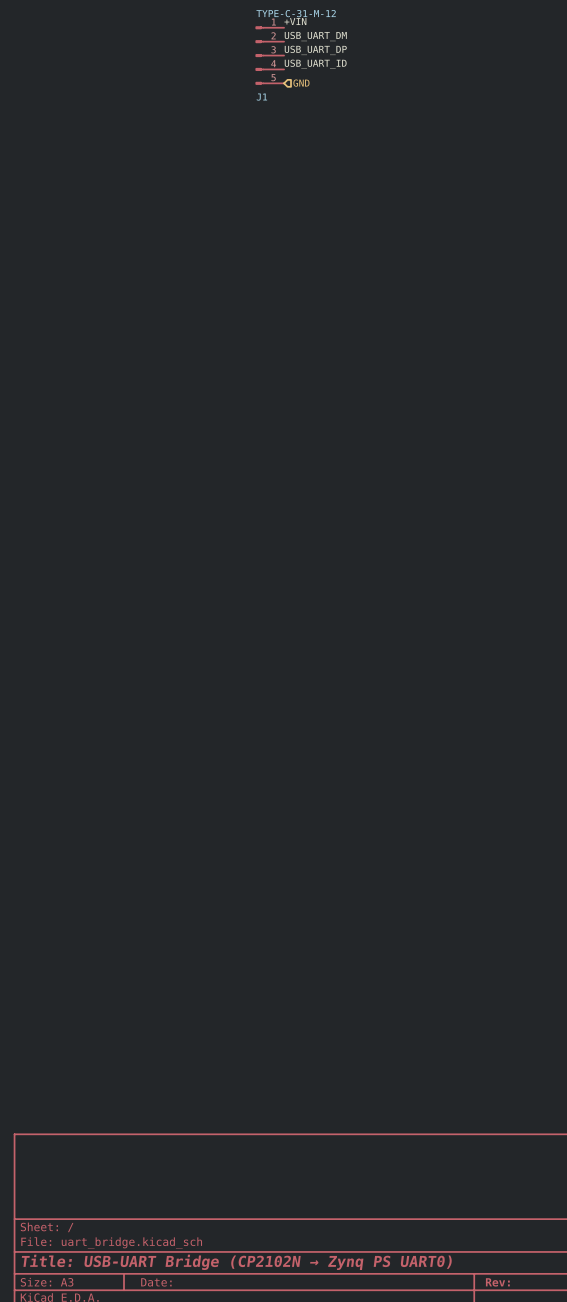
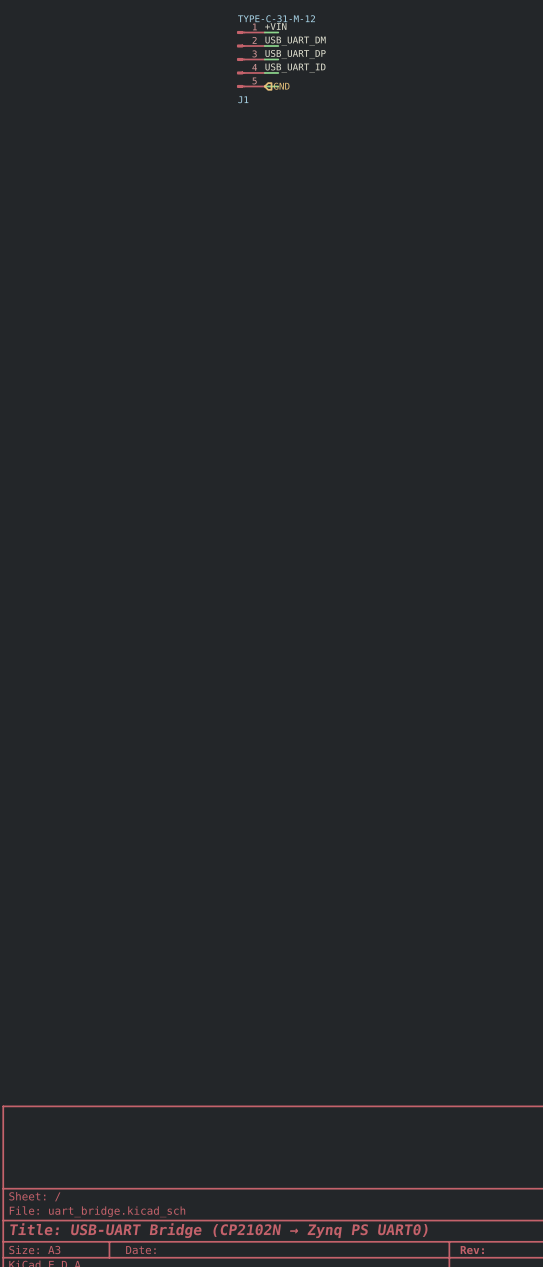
wire: none -> (264, 32) (278, 32)
wire: none -> (264, 46) (278, 46)
wire: none -> (264, 59) (278, 59)
wire: none -> (264, 72) (278, 72)
wire: none -> (264, 86) (278, 86)

